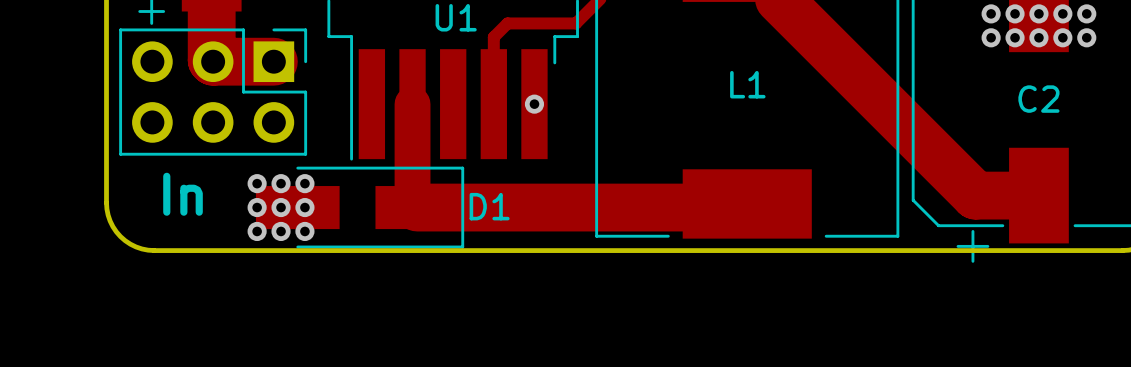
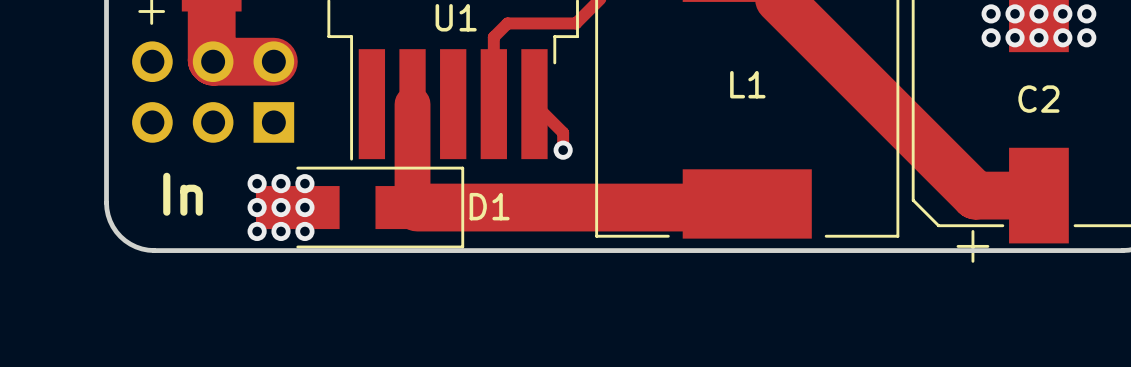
part side: top (213, 92) -> bottom (213, 92)
via position: (534, 104) -> (563, 150)
track: none -> (534, 114) (534, 104) (563, 132) (563, 150)

